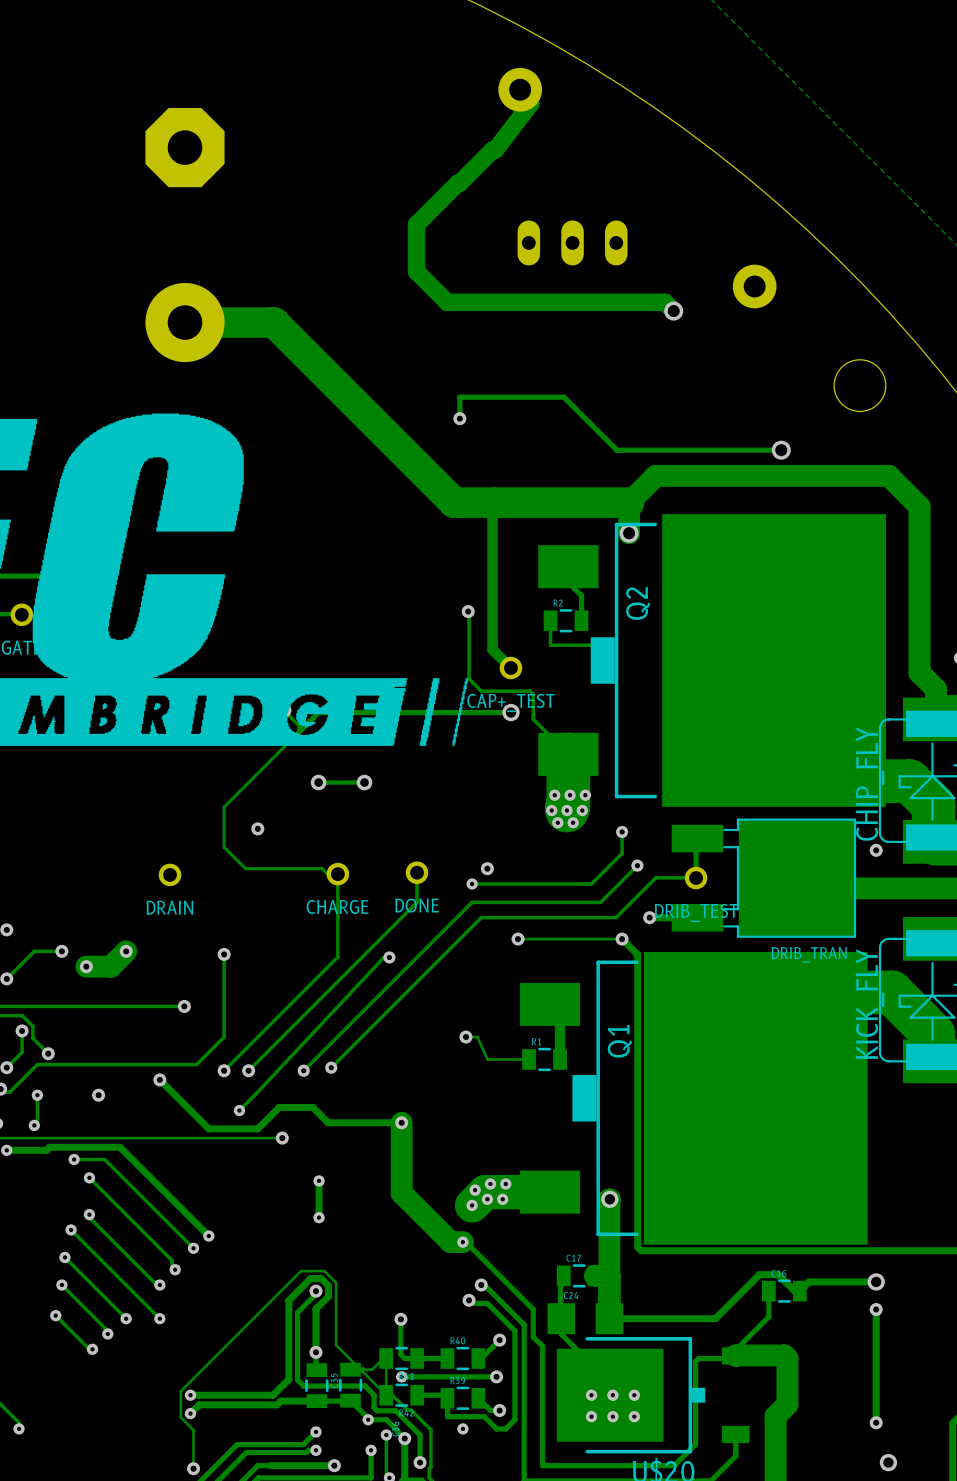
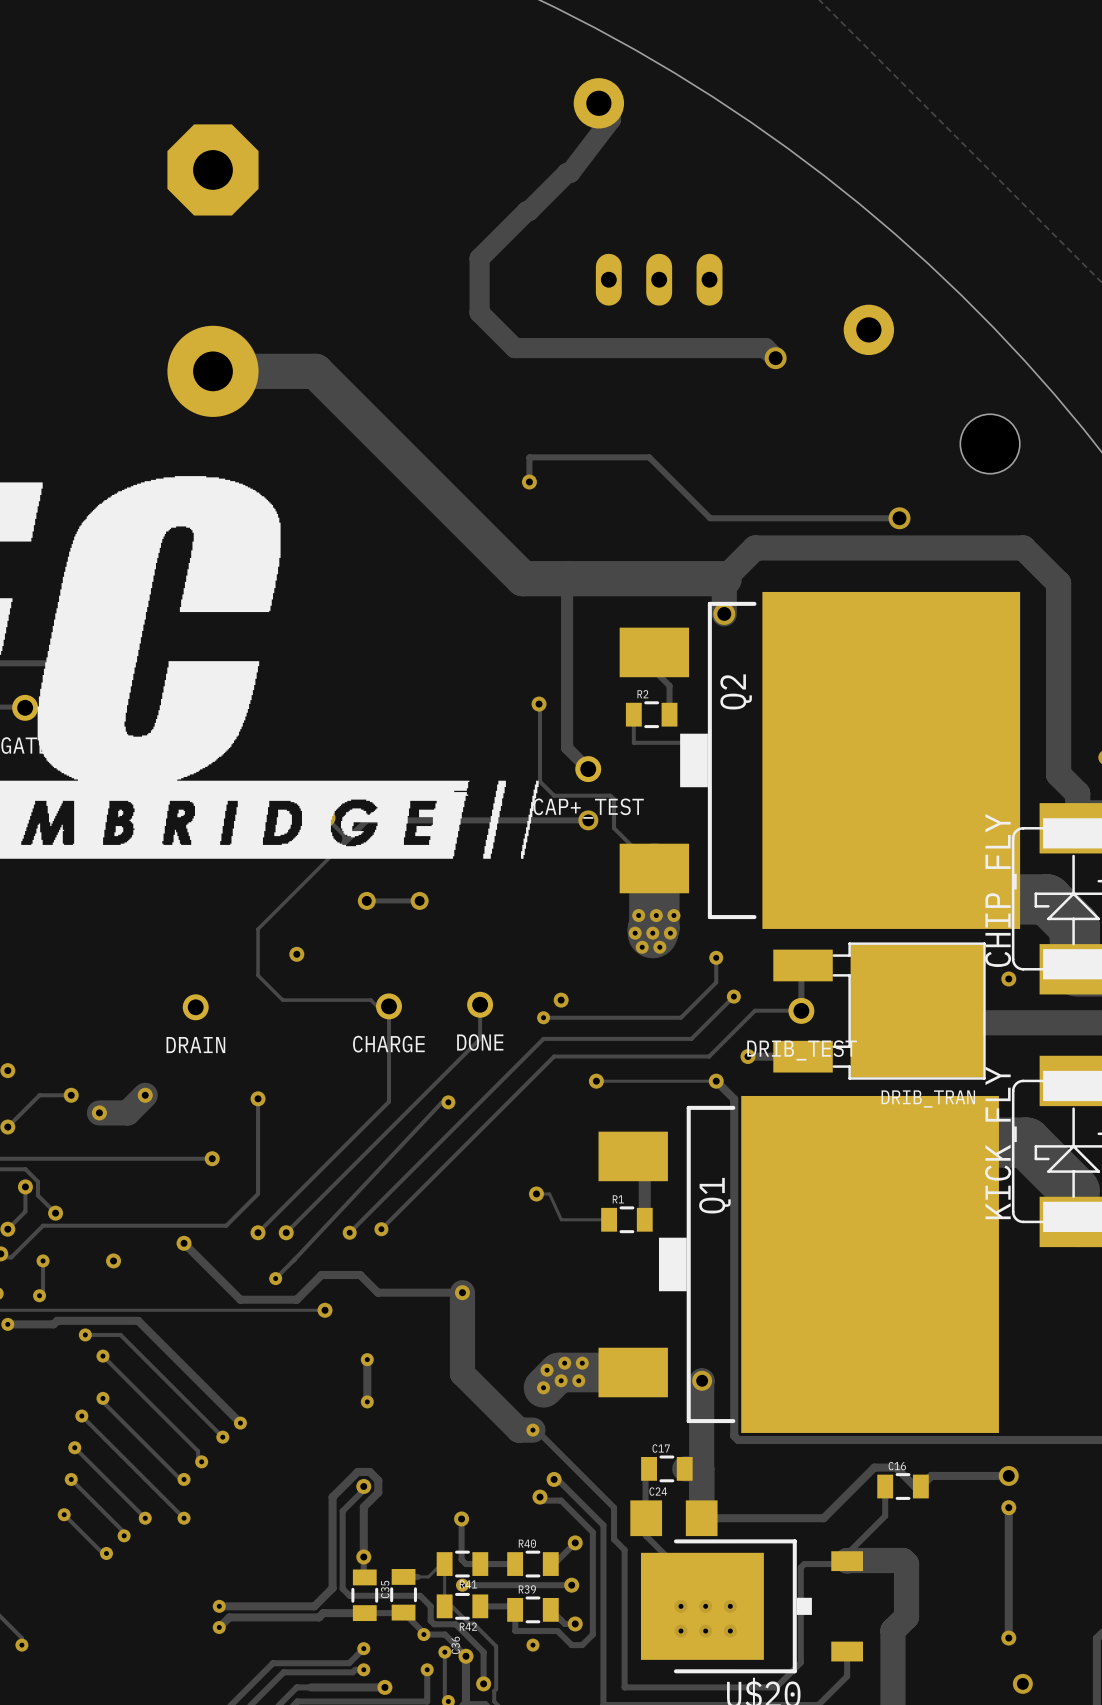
track: (386, 1395) (336, 1345) (336, 1282) (324, 1271) (301, 1271) (180, 1391) (180, 1417) (193, 1430) (193, 1468) -> none
via: (193, 1468) -> none

